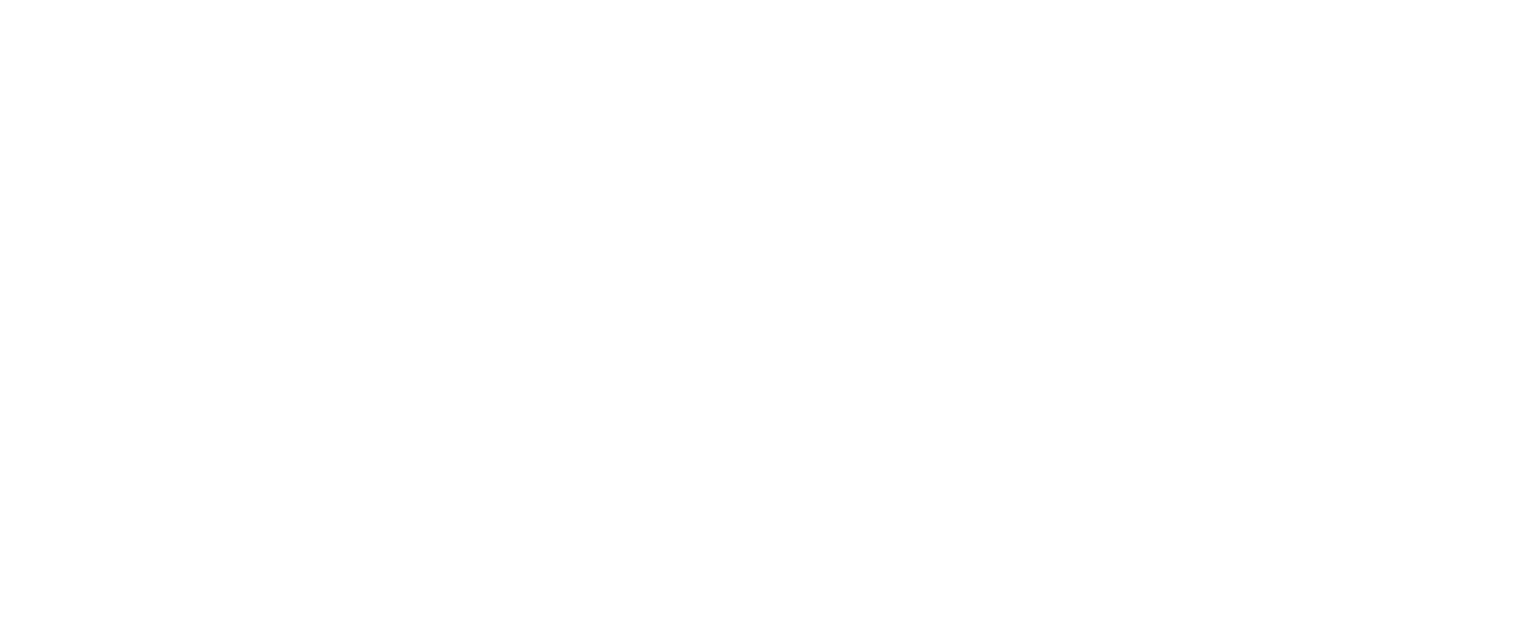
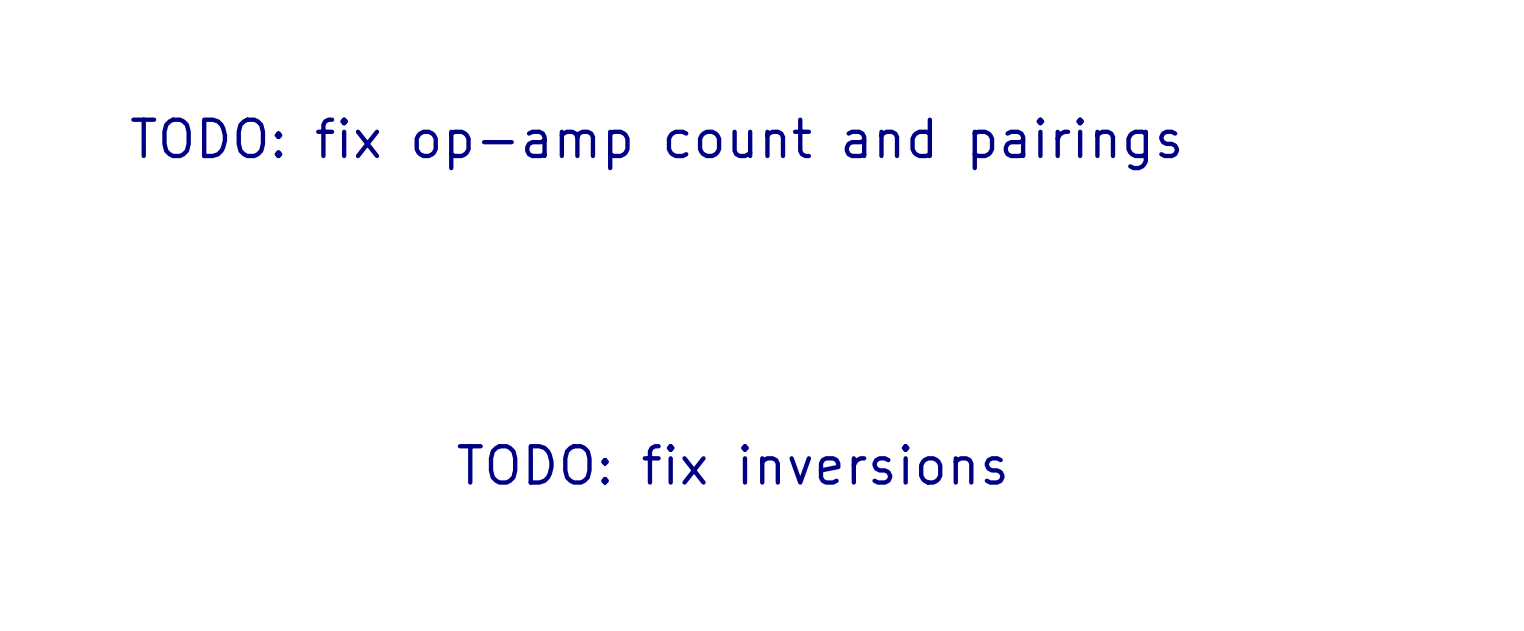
text: none -> TODO: fix op-amp count and pairings (655, 143)
text: none -> TODO: fix inversions (731, 464)

